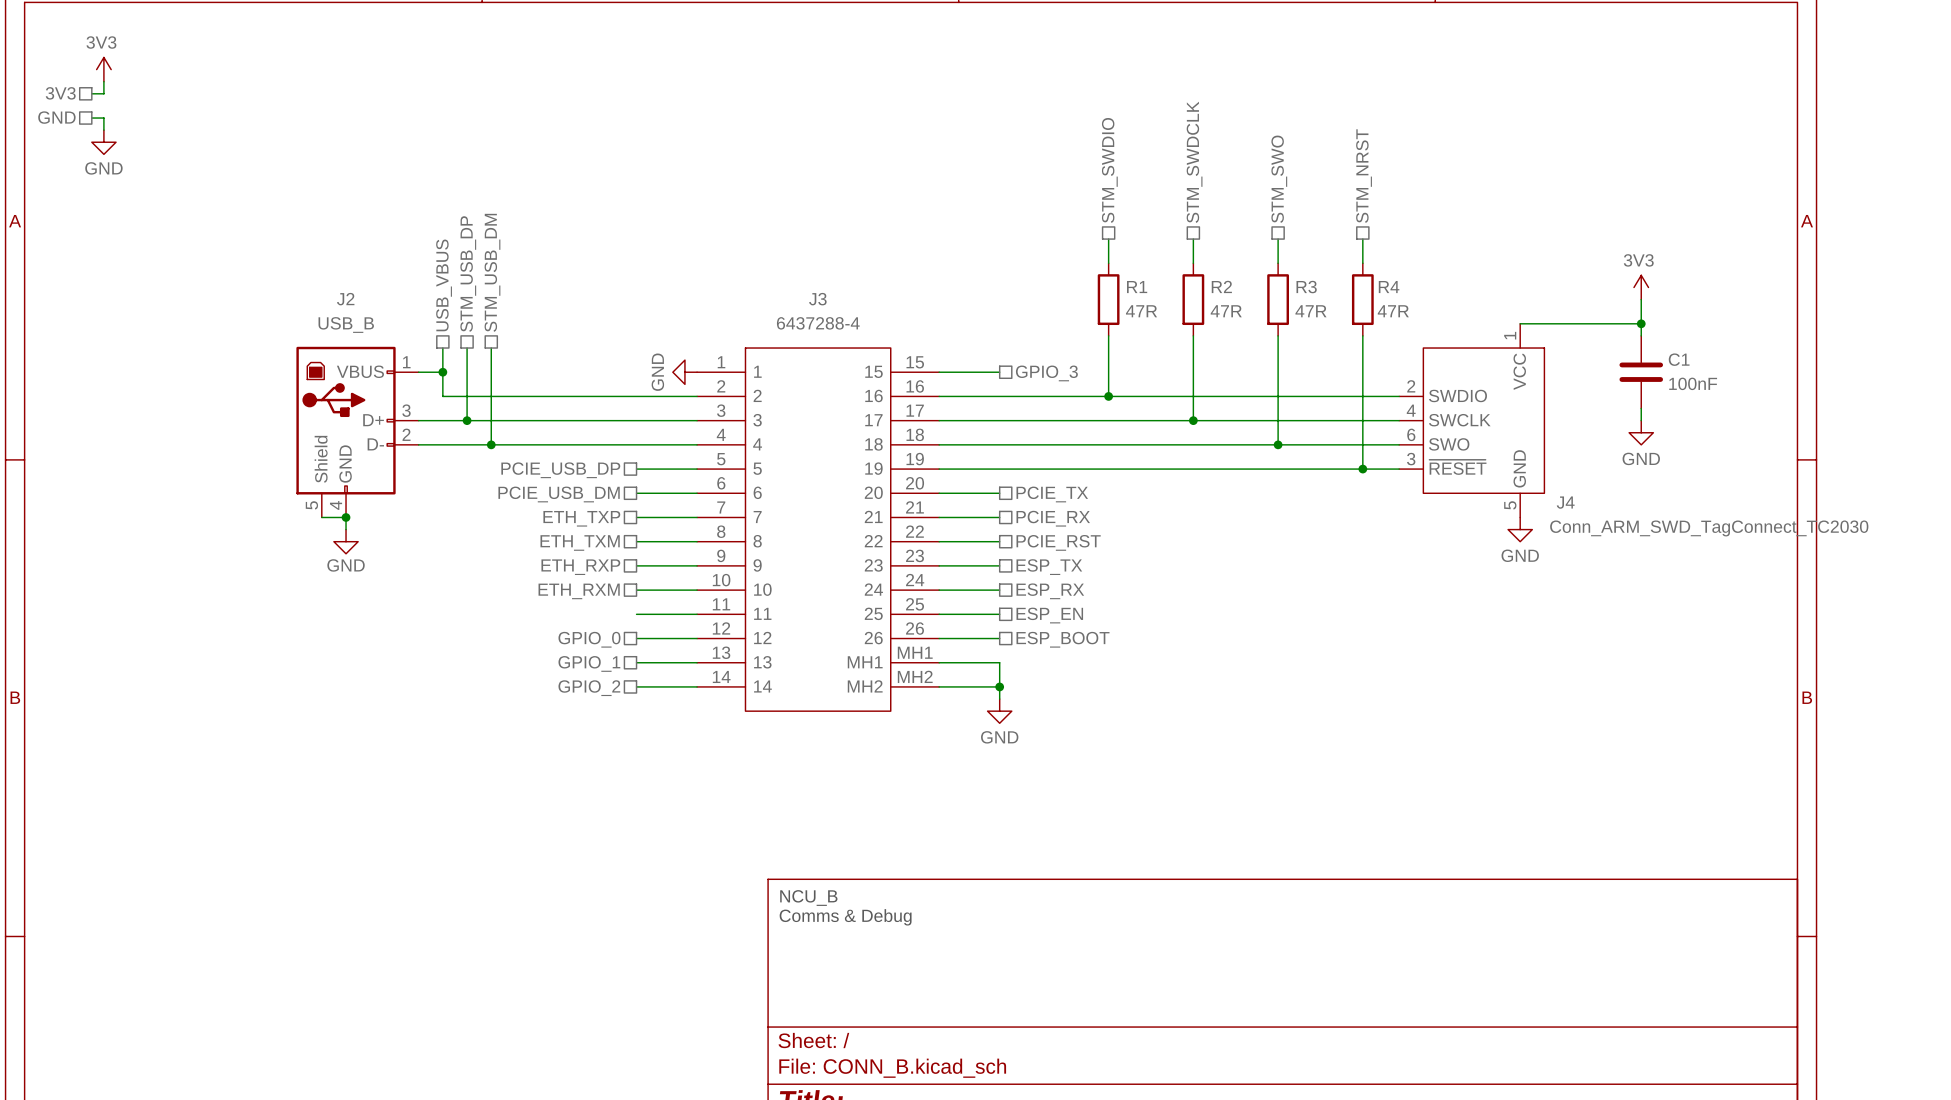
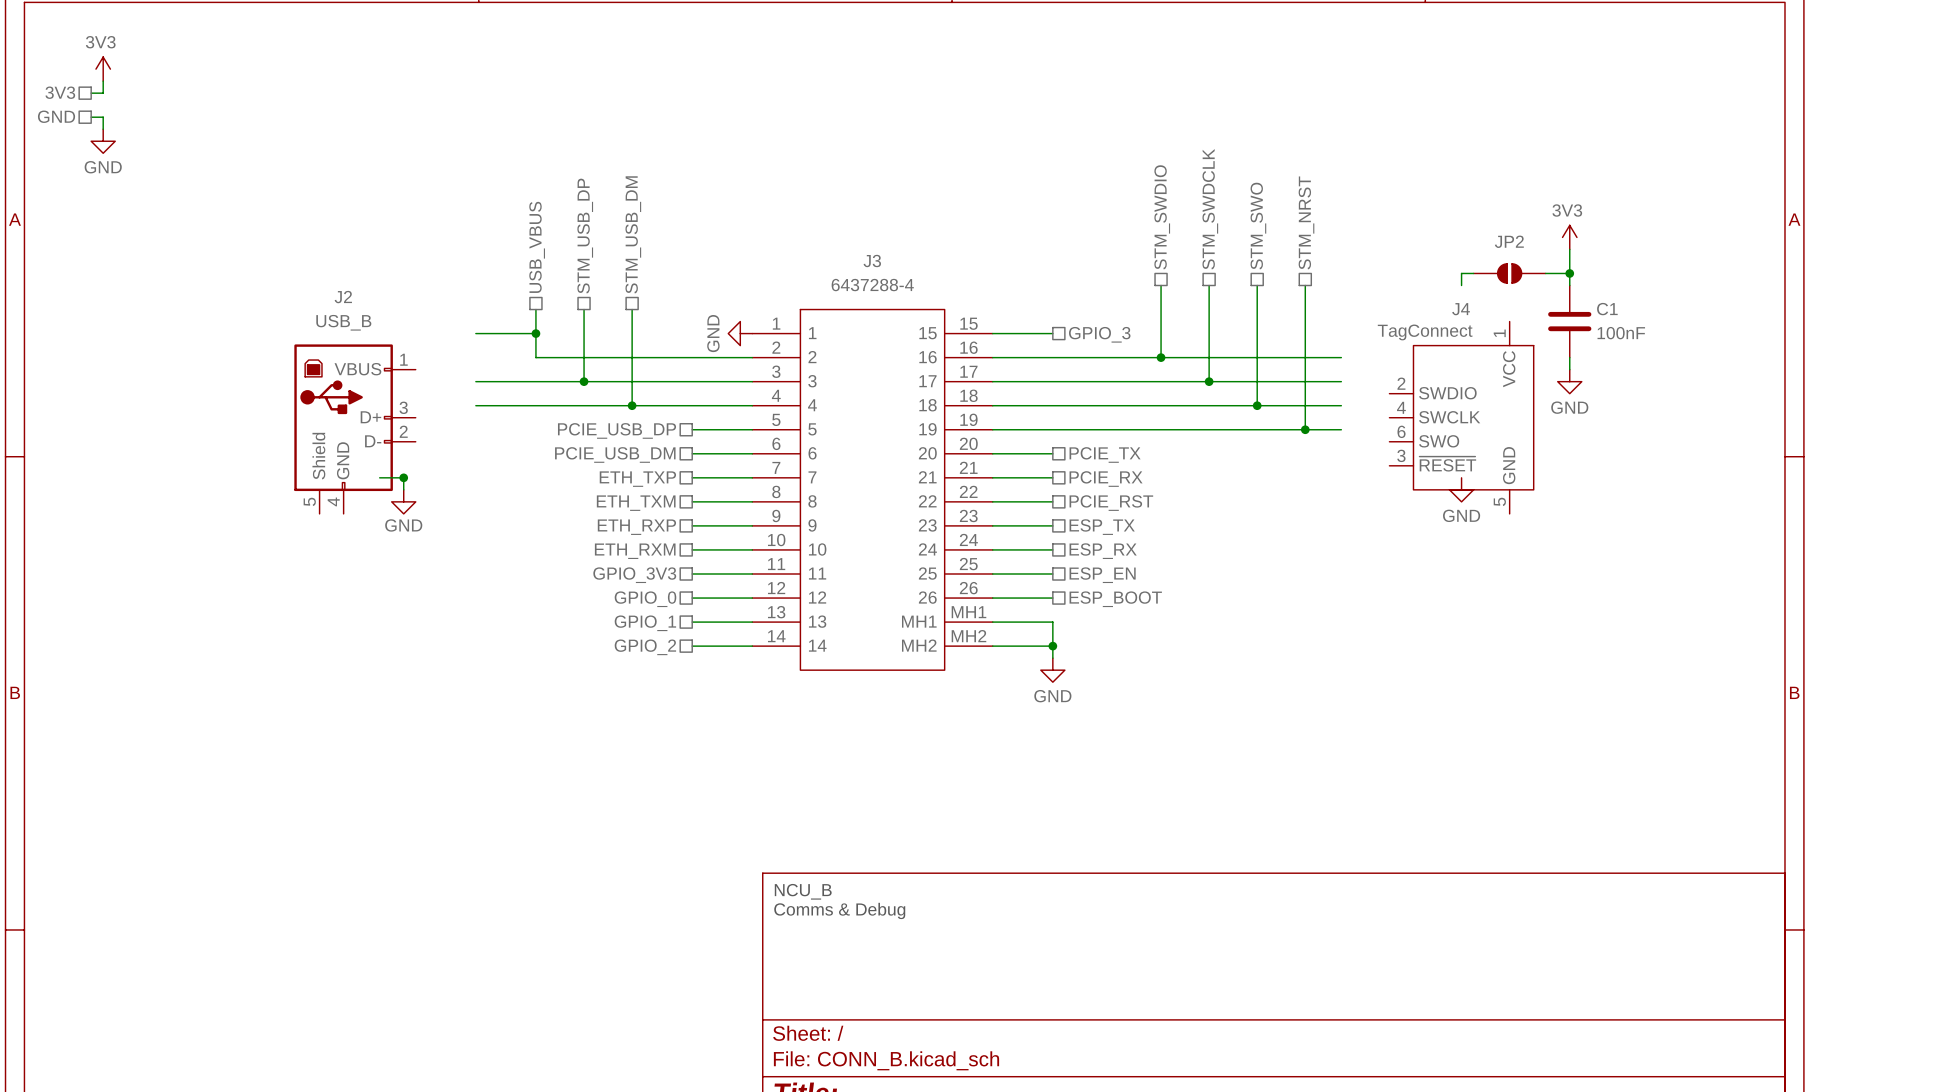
hierarchical label position: STM_SWDCLK (1194, 162) -> STM_SWDCLK (1210, 209)
hierarchical label position: STM_SWDIO (1109, 170) -> STM_SWDIO (1162, 217)
hierarchical label position: STM_NRST (1364, 176) -> STM_NRST (1306, 222)
hierarchical label position: STM_SWO (1279, 179) -> STM_SWO (1258, 226)
wire: (1108, 239) (1108, 263) -> none
wire: (1193, 239) (1193, 263) -> none
wire: (1278, 239) (1278, 263) -> none
wire: (1362, 239) (1362, 263) -> none
hierarchical label position: STM_USB_DM (492, 272) -> STM_USB_DM (633, 234)
hierarchical label position: STM_USB_DP (468, 274) -> STM_USB_DP (585, 236)
wire: none -> (1473, 273) (1461, 273) (1461, 285)
JP2: none -> (1509, 273)
wire: none -> (1545, 273) (1569, 273)
junction: none -> (1569, 273)
hierarchical label position: USB_VBUS (444, 285) -> USB_VBUS (537, 247)
wire: none -> (1161, 285) (1161, 357)
wire: none -> (1209, 285) (1209, 381)
wire: none -> (1257, 285) (1257, 405)
wire: none -> (1305, 285) (1305, 429)
power symbol position: 3V3 (1641, 287) -> 3V3 (1569, 237)
R1: 47R (1108, 299) -> none
R2: 47R (1193, 299) -> none
R3: 47R (1278, 299) -> none
R4: 47R (1362, 299) -> none
wire: (1641, 299) (1641, 335) -> (1569, 249) (1569, 285)
wire: none -> (535, 309) (535, 357) (752, 357)
wire: (1520, 323) (1641, 323) -> none
junction: (1641, 323) -> none
wire: none -> (475, 333) (535, 333)
junction: none -> (535, 333)
wire: (1108, 335) (1108, 396) -> none
wire: (1193, 335) (1193, 420) -> none
wire: (1278, 335) (1278, 444) -> none
wire: (1362, 335) (1362, 469) -> none
wire: (442, 348) (442, 396) (697, 396) -> none
wire: (467, 348) (467, 420) -> (584, 309) (584, 381)
wire: (491, 348) (491, 444) -> (632, 309) (632, 405)
wire: none -> (992, 357) (1341, 357)
junction: none -> (1161, 357)
wire: (418, 372) (442, 372) -> none
junction: (442, 372) -> none
power symbol position: GND (684, 372) -> GND (740, 333)
wire: (939, 372) (999, 372) -> (992, 333) (1052, 333)
C1 position: (1641, 372) -> (1569, 321)
hierarchical label position: GPIO_3 (1046, 373) -> GPIO_3 (1099, 334)
junction: none -> (584, 381)
wire: none -> (992, 381) (1341, 381)
junction: none -> (1209, 381)
wire: (939, 396) (1399, 396) -> none
junction: (1108, 396) -> none
junction: none -> (632, 405)
wire: none -> (992, 405) (1341, 405)
junction: none -> (1257, 405)
wire: (1641, 408) (1641, 420) -> (1569, 357) (1569, 369)
wire: (418, 420) (697, 420) -> (475, 381) (752, 381)
junction: (467, 420) -> none
wire: (939, 420) (1399, 420) -> none
junction: (1193, 420) -> none
wire: none -> (992, 429) (1341, 429)
junction: none -> (1305, 429)
power symbol position: GND (1641, 432) -> GND (1569, 381)
wire: (418, 444) (697, 444) -> (475, 405) (752, 405)
junction: (491, 444) -> none
wire: (939, 444) (1399, 444) -> none
junction: (1278, 444) -> none
wire: (636, 469) (697, 469) -> (692, 429) (752, 429)
wire: (939, 469) (1399, 469) -> none
junction: (1362, 469) -> none
hierarchical label position: PCIE_USB_DP (560, 470) -> PCIE_USB_DP (617, 430)
junction: none -> (403, 477)
wire: (636, 493) (697, 493) -> (692, 453) (752, 453)
wire: (939, 493) (999, 493) -> (992, 453) (1052, 453)
hierarchical label position: PCIE_USB_DM (559, 494) -> PCIE_USB_DM (615, 454)
hierarchical label position: PCIE_TX (1052, 494) -> PCIE_TX (1105, 454)
J4 name position: J4 (1565, 502) -> J4 (1461, 309)
wire: (321, 517) (346, 517) (346, 529) -> (379, 477) (403, 477) (403, 489)
junction: (346, 517) -> none
wire: (636, 517) (697, 517) -> (692, 477) (752, 477)
wire: (939, 517) (999, 517) -> (992, 477) (1052, 477)
hierarchical label position: ETH_TXP (581, 518) -> ETH_TXP (637, 479)
hierarchical label position: PCIE_RX (1053, 518) -> PCIE_RX (1106, 479)
J4 value: Conn_ARM_SWD_TagConnect_TC2030 (1709, 528) -> TagConnect (1425, 332)
J3 position: (818, 529) -> (872, 489)
power symbol position: GND (1520, 529) -> GND (1461, 489)
power symbol position: GND (346, 541) -> GND (403, 501)
wire: (636, 541) (697, 541) -> (692, 501) (752, 501)
wire: (939, 541) (999, 541) -> (992, 501) (1052, 501)
hierarchical label position: ETH_TXM (580, 542) -> ETH_TXM (636, 503)
hierarchical label position: PCIE_RST (1058, 542) -> PCIE_RST (1111, 503)
wire: (636, 565) (697, 565) -> (692, 525) (752, 525)
wire: (939, 565) (999, 565) -> (992, 525) (1052, 525)
hierarchical label position: ETH_RXP (580, 567) -> ETH_RXP (636, 527)
hierarchical label position: ESP_TX (1049, 567) -> ESP_TX (1102, 527)
hierarchical label: none -> GPIO_3V3 (634, 575)
wire: (636, 590) (697, 590) -> (692, 549) (752, 549)
wire: (939, 590) (999, 590) -> (992, 549) (1052, 549)
hierarchical label position: ETH_RXM (579, 591) -> ETH_RXM (635, 551)
hierarchical label position: ESP_RX (1050, 591) -> ESP_RX (1103, 551)
wire: (636, 614) (697, 614) -> (692, 573) (752, 573)
wire: (939, 614) (999, 614) -> (992, 573) (1052, 573)
hierarchical label position: ESP_EN (1049, 615) -> ESP_EN (1102, 575)
wire: (636, 638) (697, 638) -> (692, 598) (752, 598)
wire: (939, 638) (999, 638) -> (992, 598) (1052, 598)
hierarchical label position: GPIO_0 (589, 639) -> GPIO_0 (645, 599)
hierarchical label position: ESP_BOOT (1063, 639) -> ESP_BOOT (1115, 599)
junction: none -> (1052, 646)
wire: (636, 662) (697, 662) -> (692, 622) (752, 622)
wire: (939, 662) (999, 662) (999, 699) -> (992, 622) (1052, 622) (1052, 658)
hierarchical label position: GPIO_1 (589, 663) -> GPIO_1 (645, 623)
wire: (636, 686) (697, 686) -> (692, 646) (752, 646)
wire: (939, 686) (999, 686) -> (992, 646) (1052, 646)
junction: (999, 686) -> none
hierarchical label position: GPIO_2 (589, 688) -> GPIO_2 (645, 647)
power symbol position: GND (999, 711) -> GND (1052, 670)

